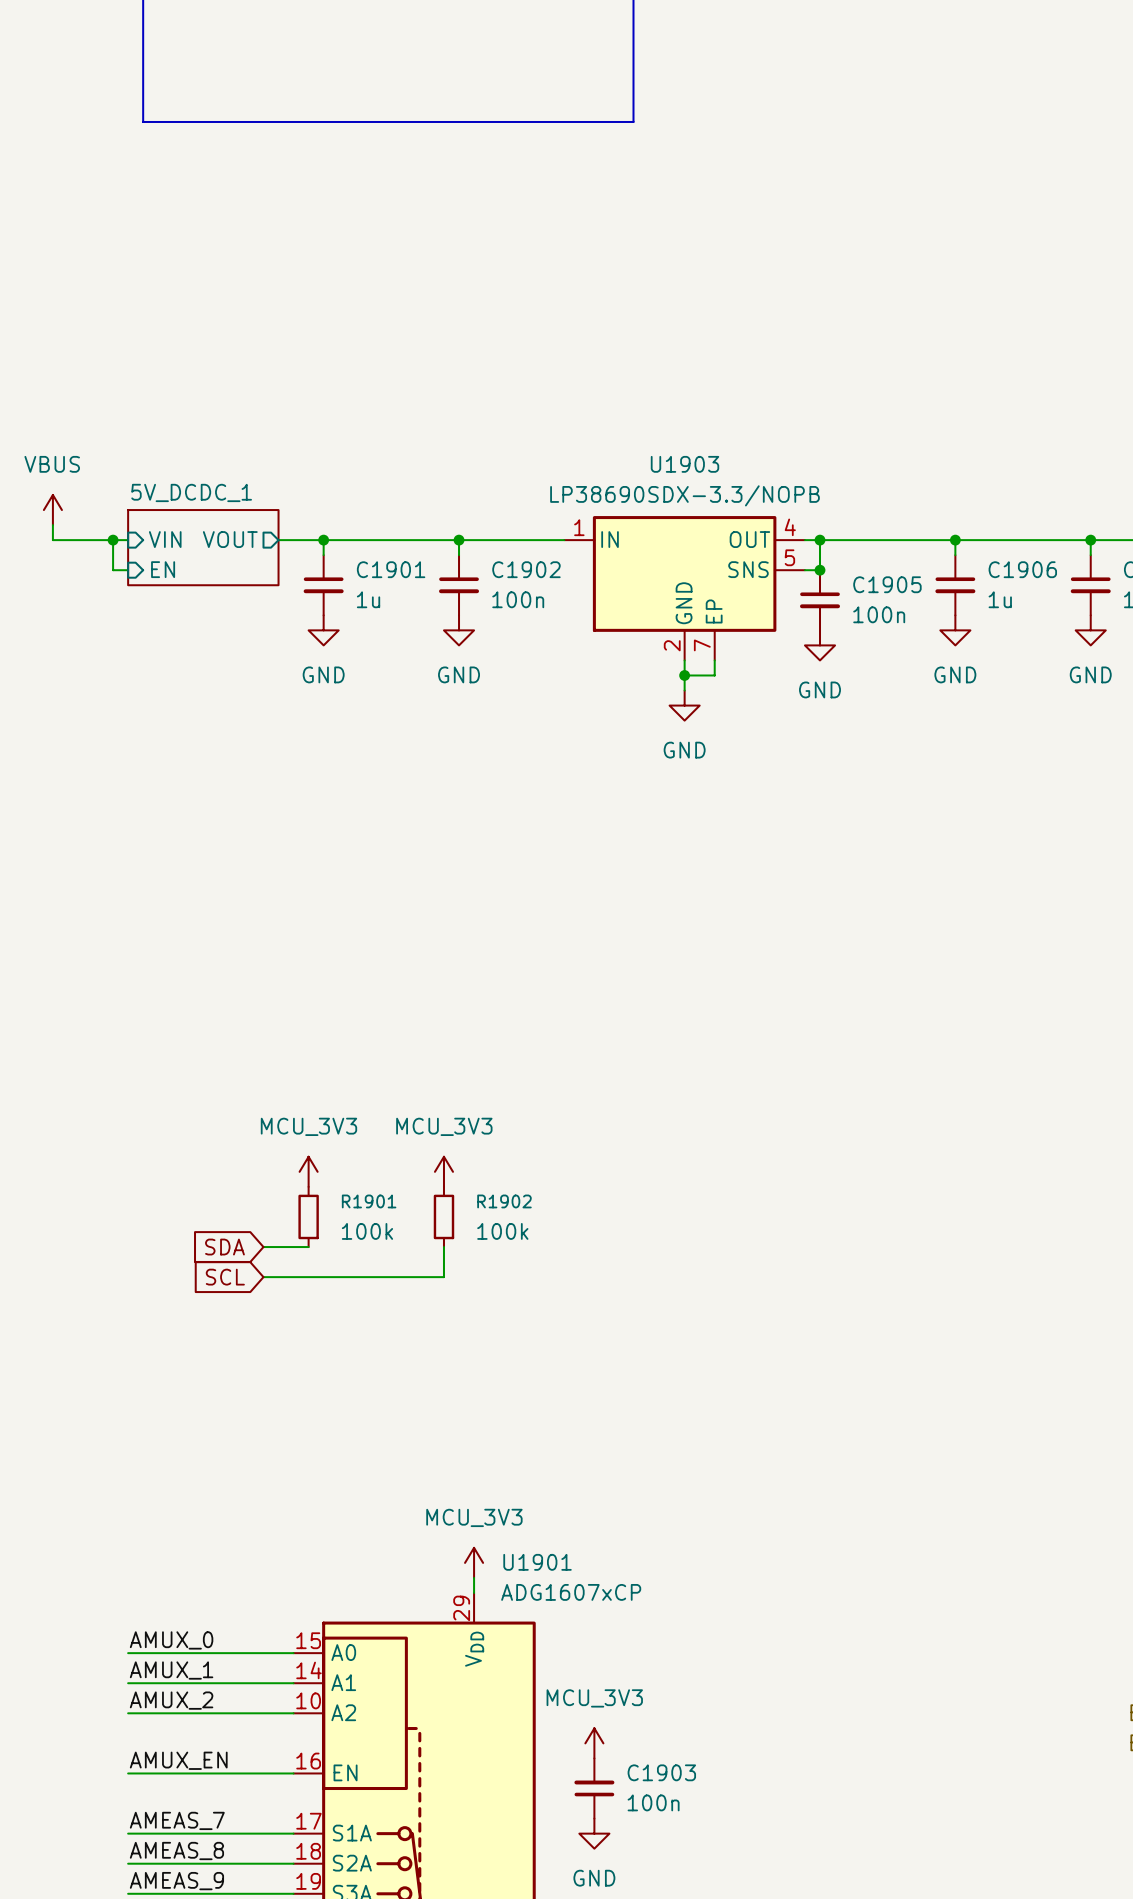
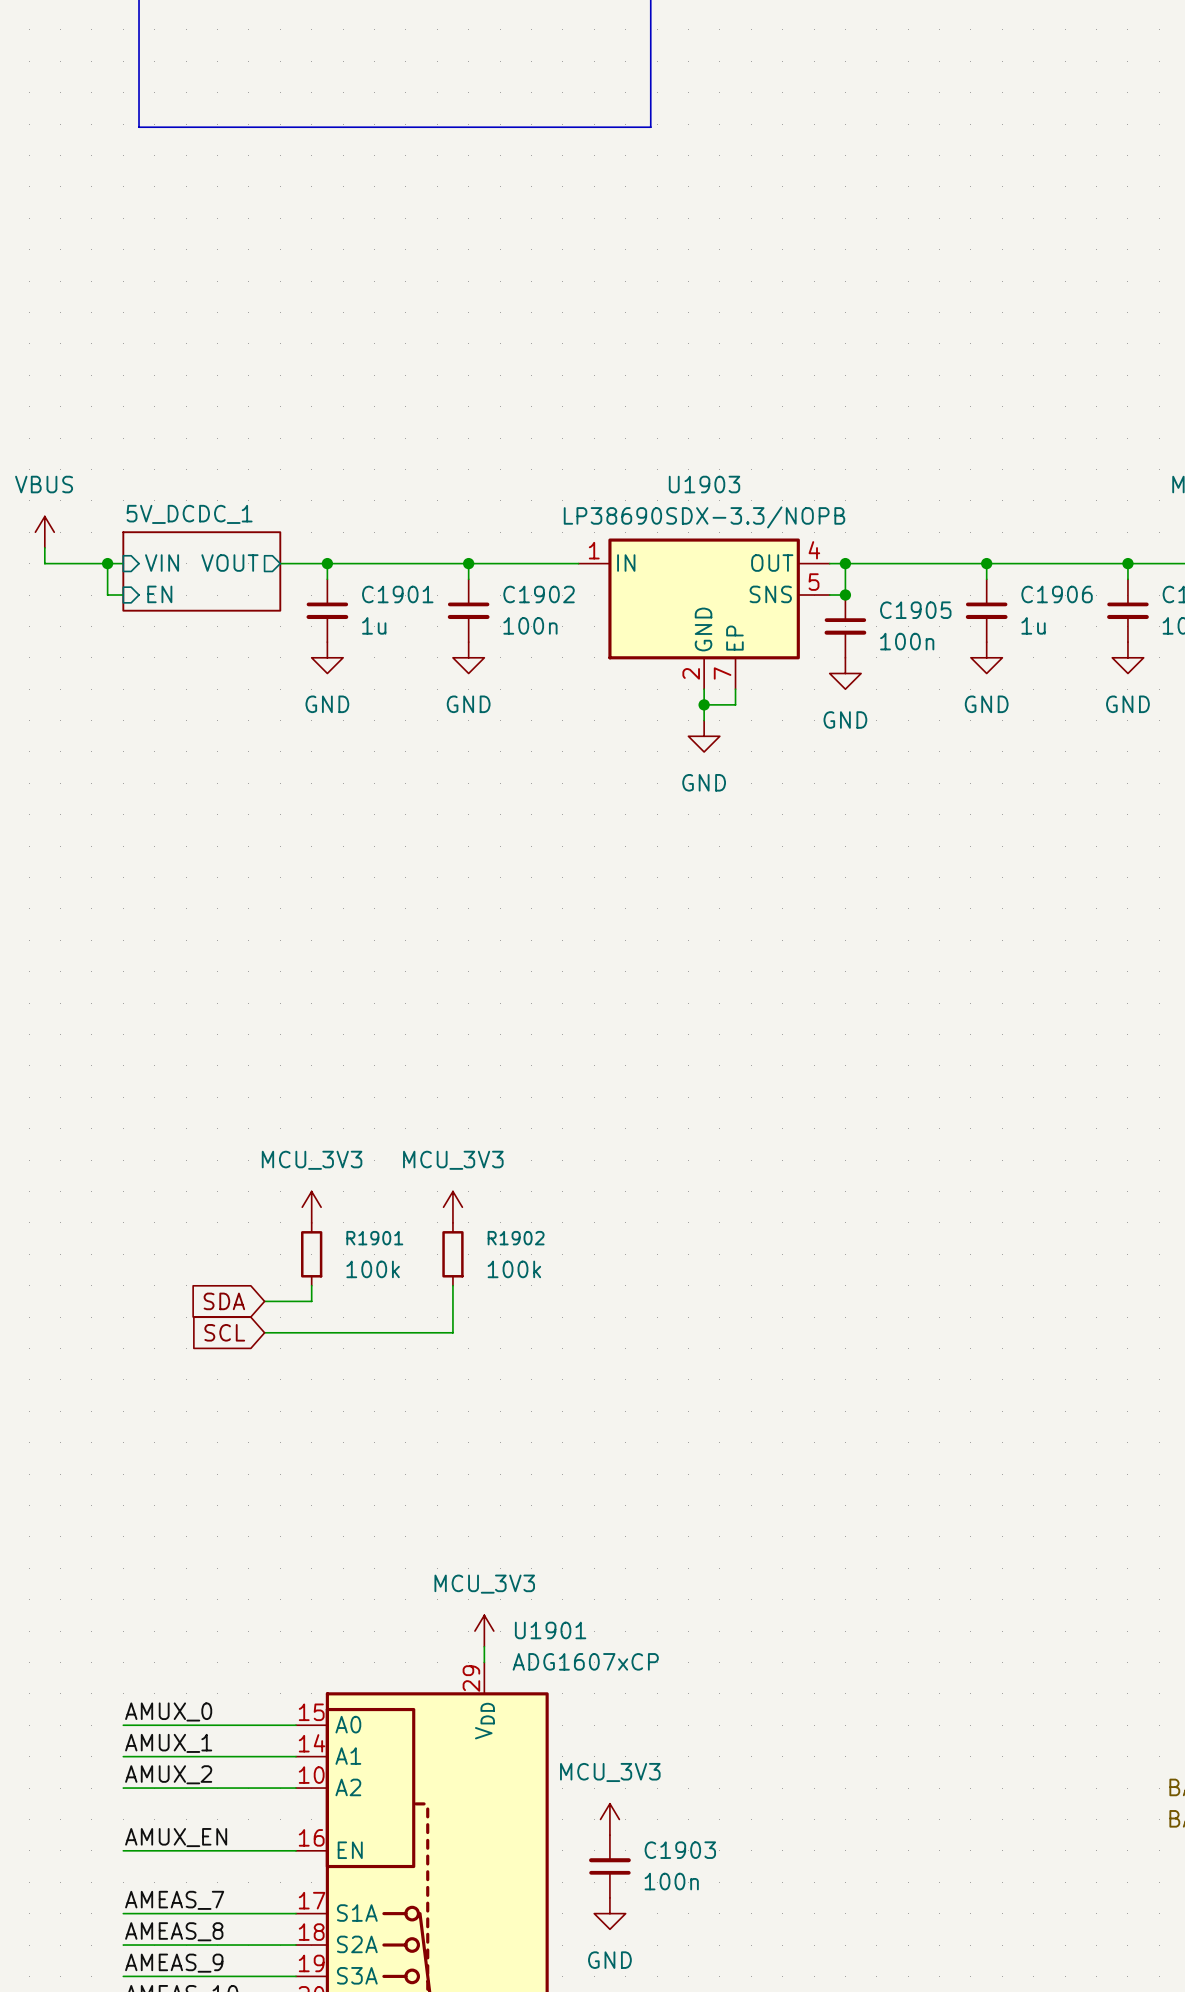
power symbol position: MCU_3V3 (308, 1171) -> MCU_3V3 (311, 1207)
power symbol position: MCU_3V3 (443, 1171) -> MCU_3V3 (452, 1207)
R1901 position: (308, 1216) -> (311, 1254)
R1902 position: (443, 1216) -> (452, 1254)

